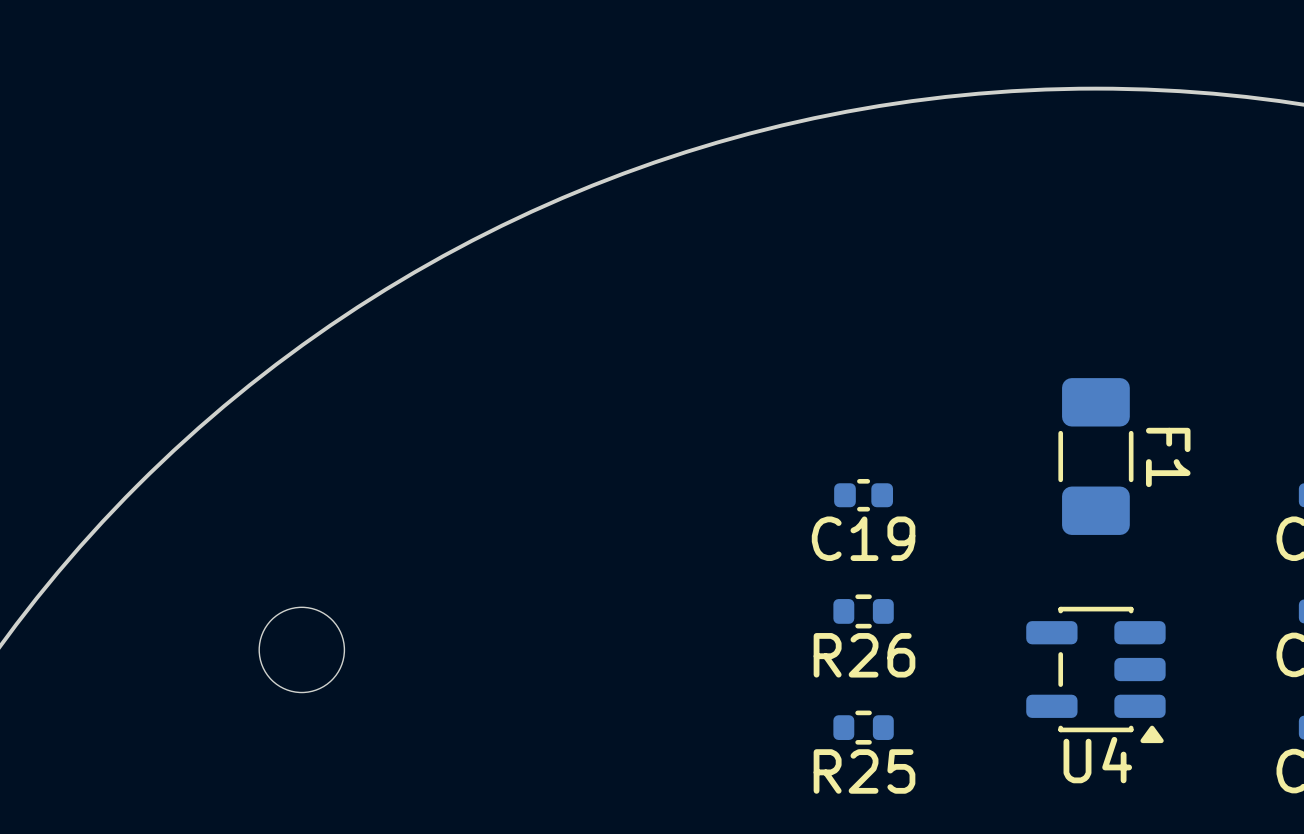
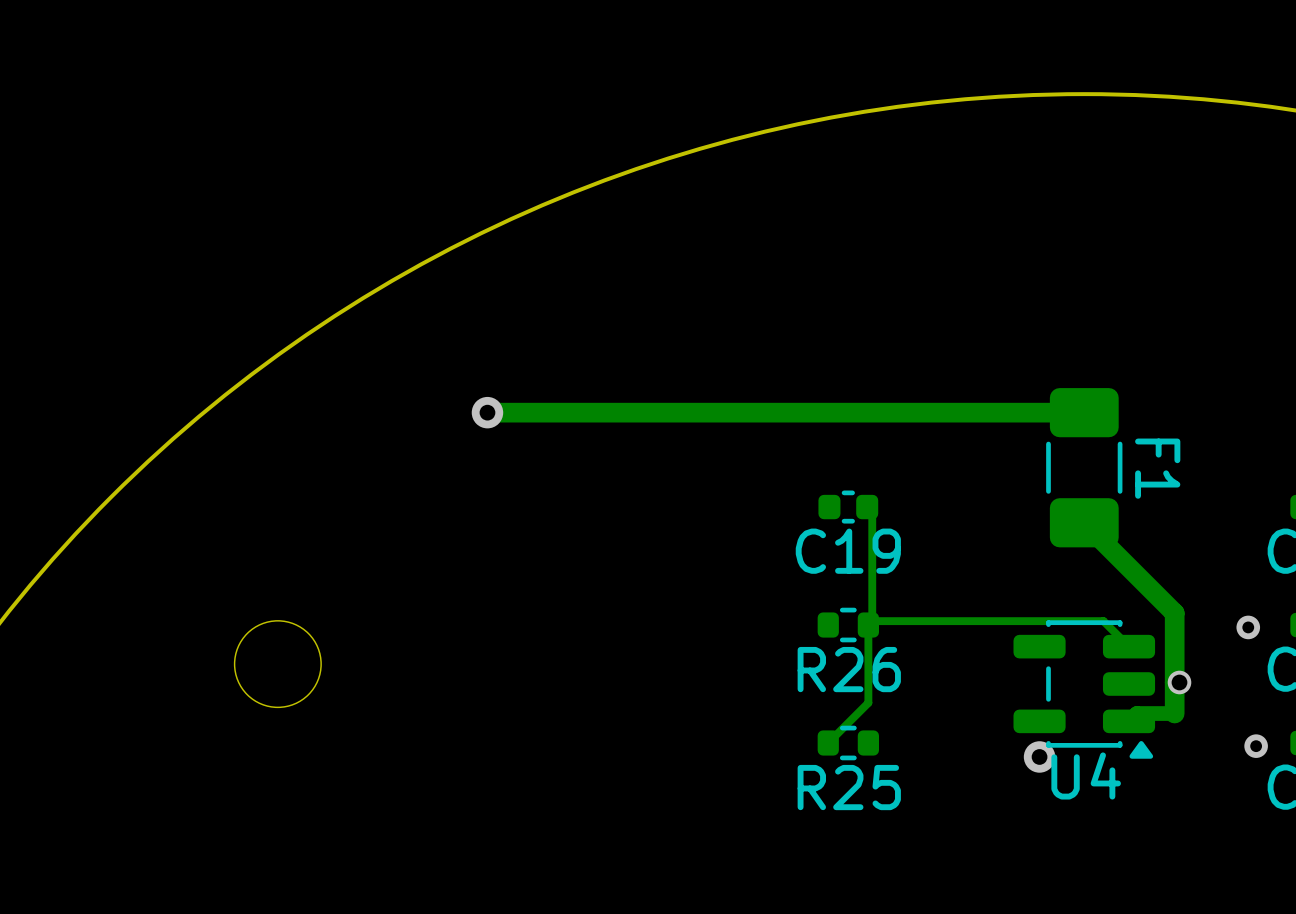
via: none -> (487, 412)
track: none -> (1084, 412) (487, 412)
track: none -> (867, 507) (872, 512) (872, 621)
track: none -> (1084, 522) (1174, 613) (1174, 713) (1136, 713) (1129, 721)
track: none -> (872, 621) (868, 625) (868, 702) (828, 742)
track: none -> (872, 621) (1103, 621) (1129, 646)
via: none -> (1248, 627)
via: none -> (1179, 682)
via: none -> (1256, 746)
via: none -> (1039, 756)

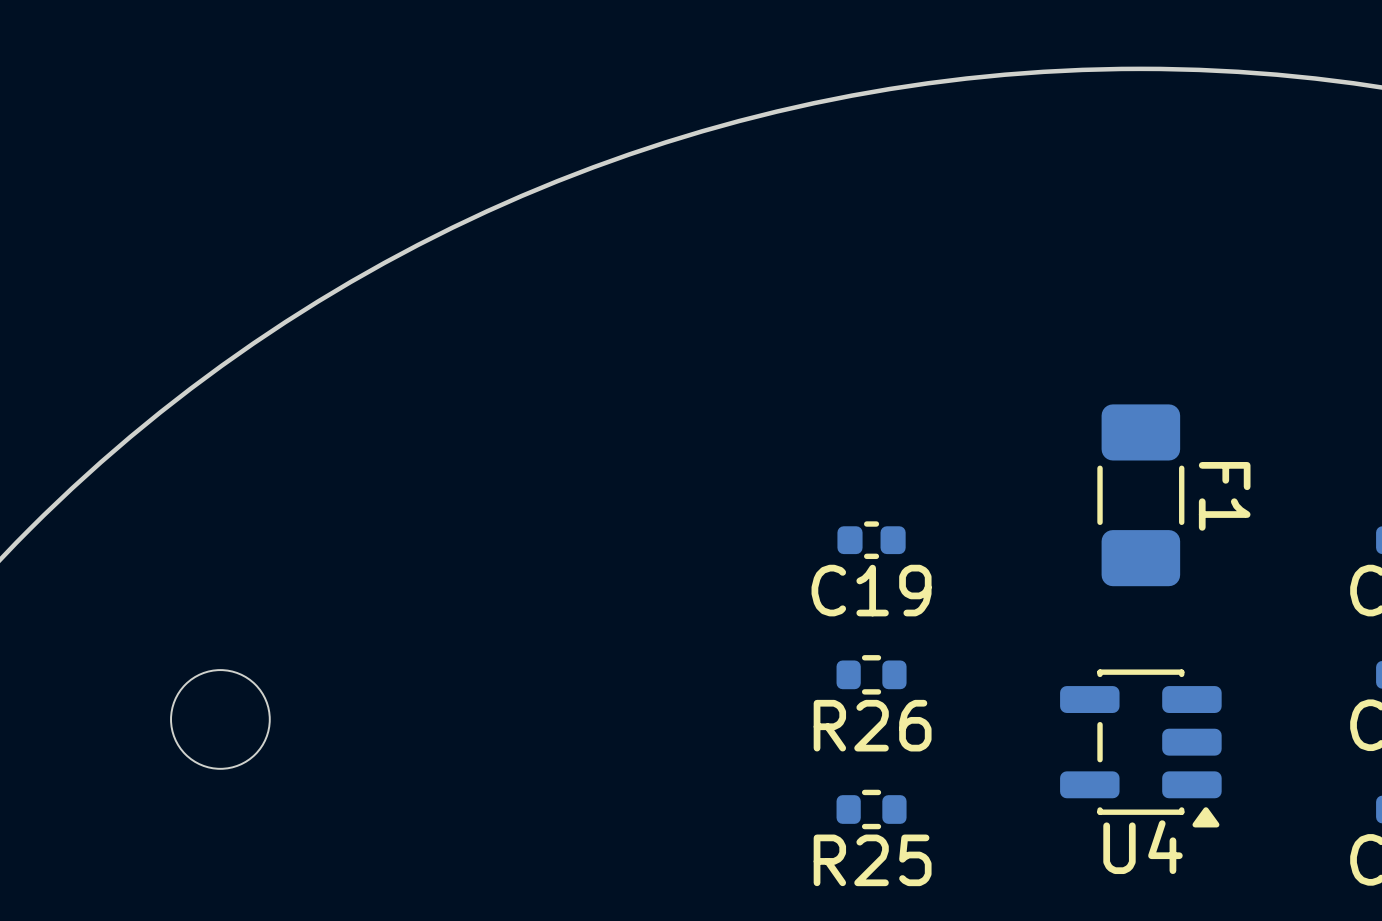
via: (487, 412) -> none
track: (1084, 412) (487, 412) -> none
track: (867, 507) (872, 512) (872, 621) -> none
track: (1084, 522) (1174, 613) (1174, 713) (1136, 713) (1129, 721) -> none
track: (872, 621) (868, 625) (868, 702) (828, 742) -> none
track: (872, 621) (1103, 621) (1129, 646) -> none
via: (1248, 627) -> none
via: (1179, 682) -> none
via: (1256, 746) -> none
via: (1039, 756) -> none

